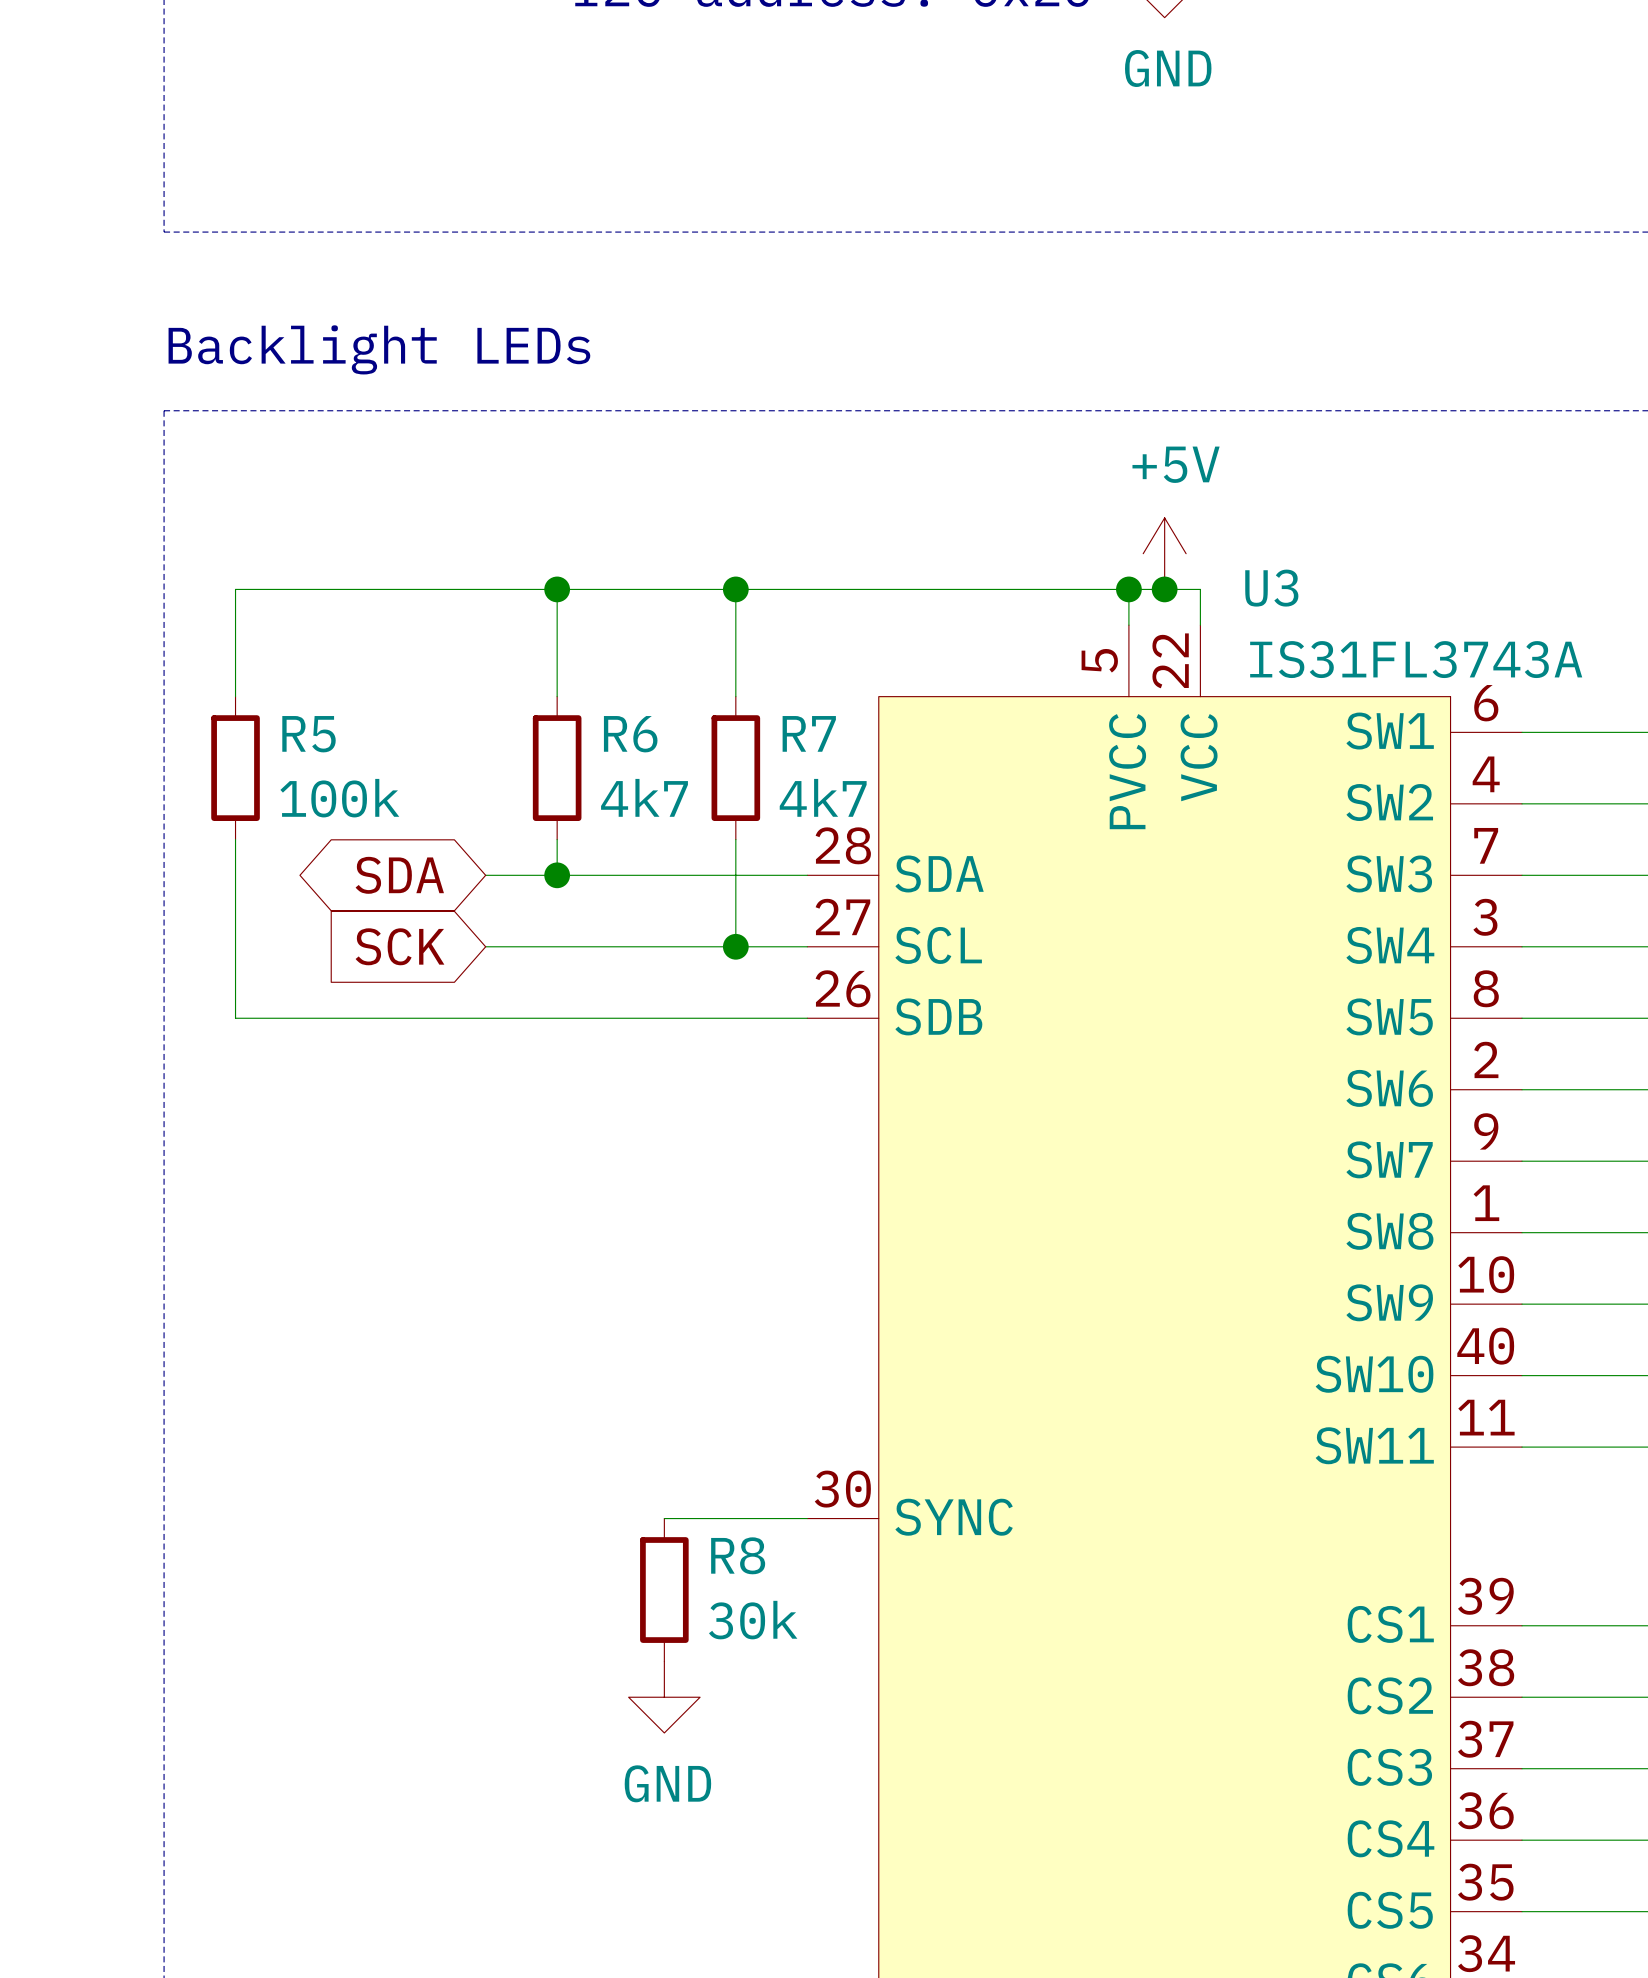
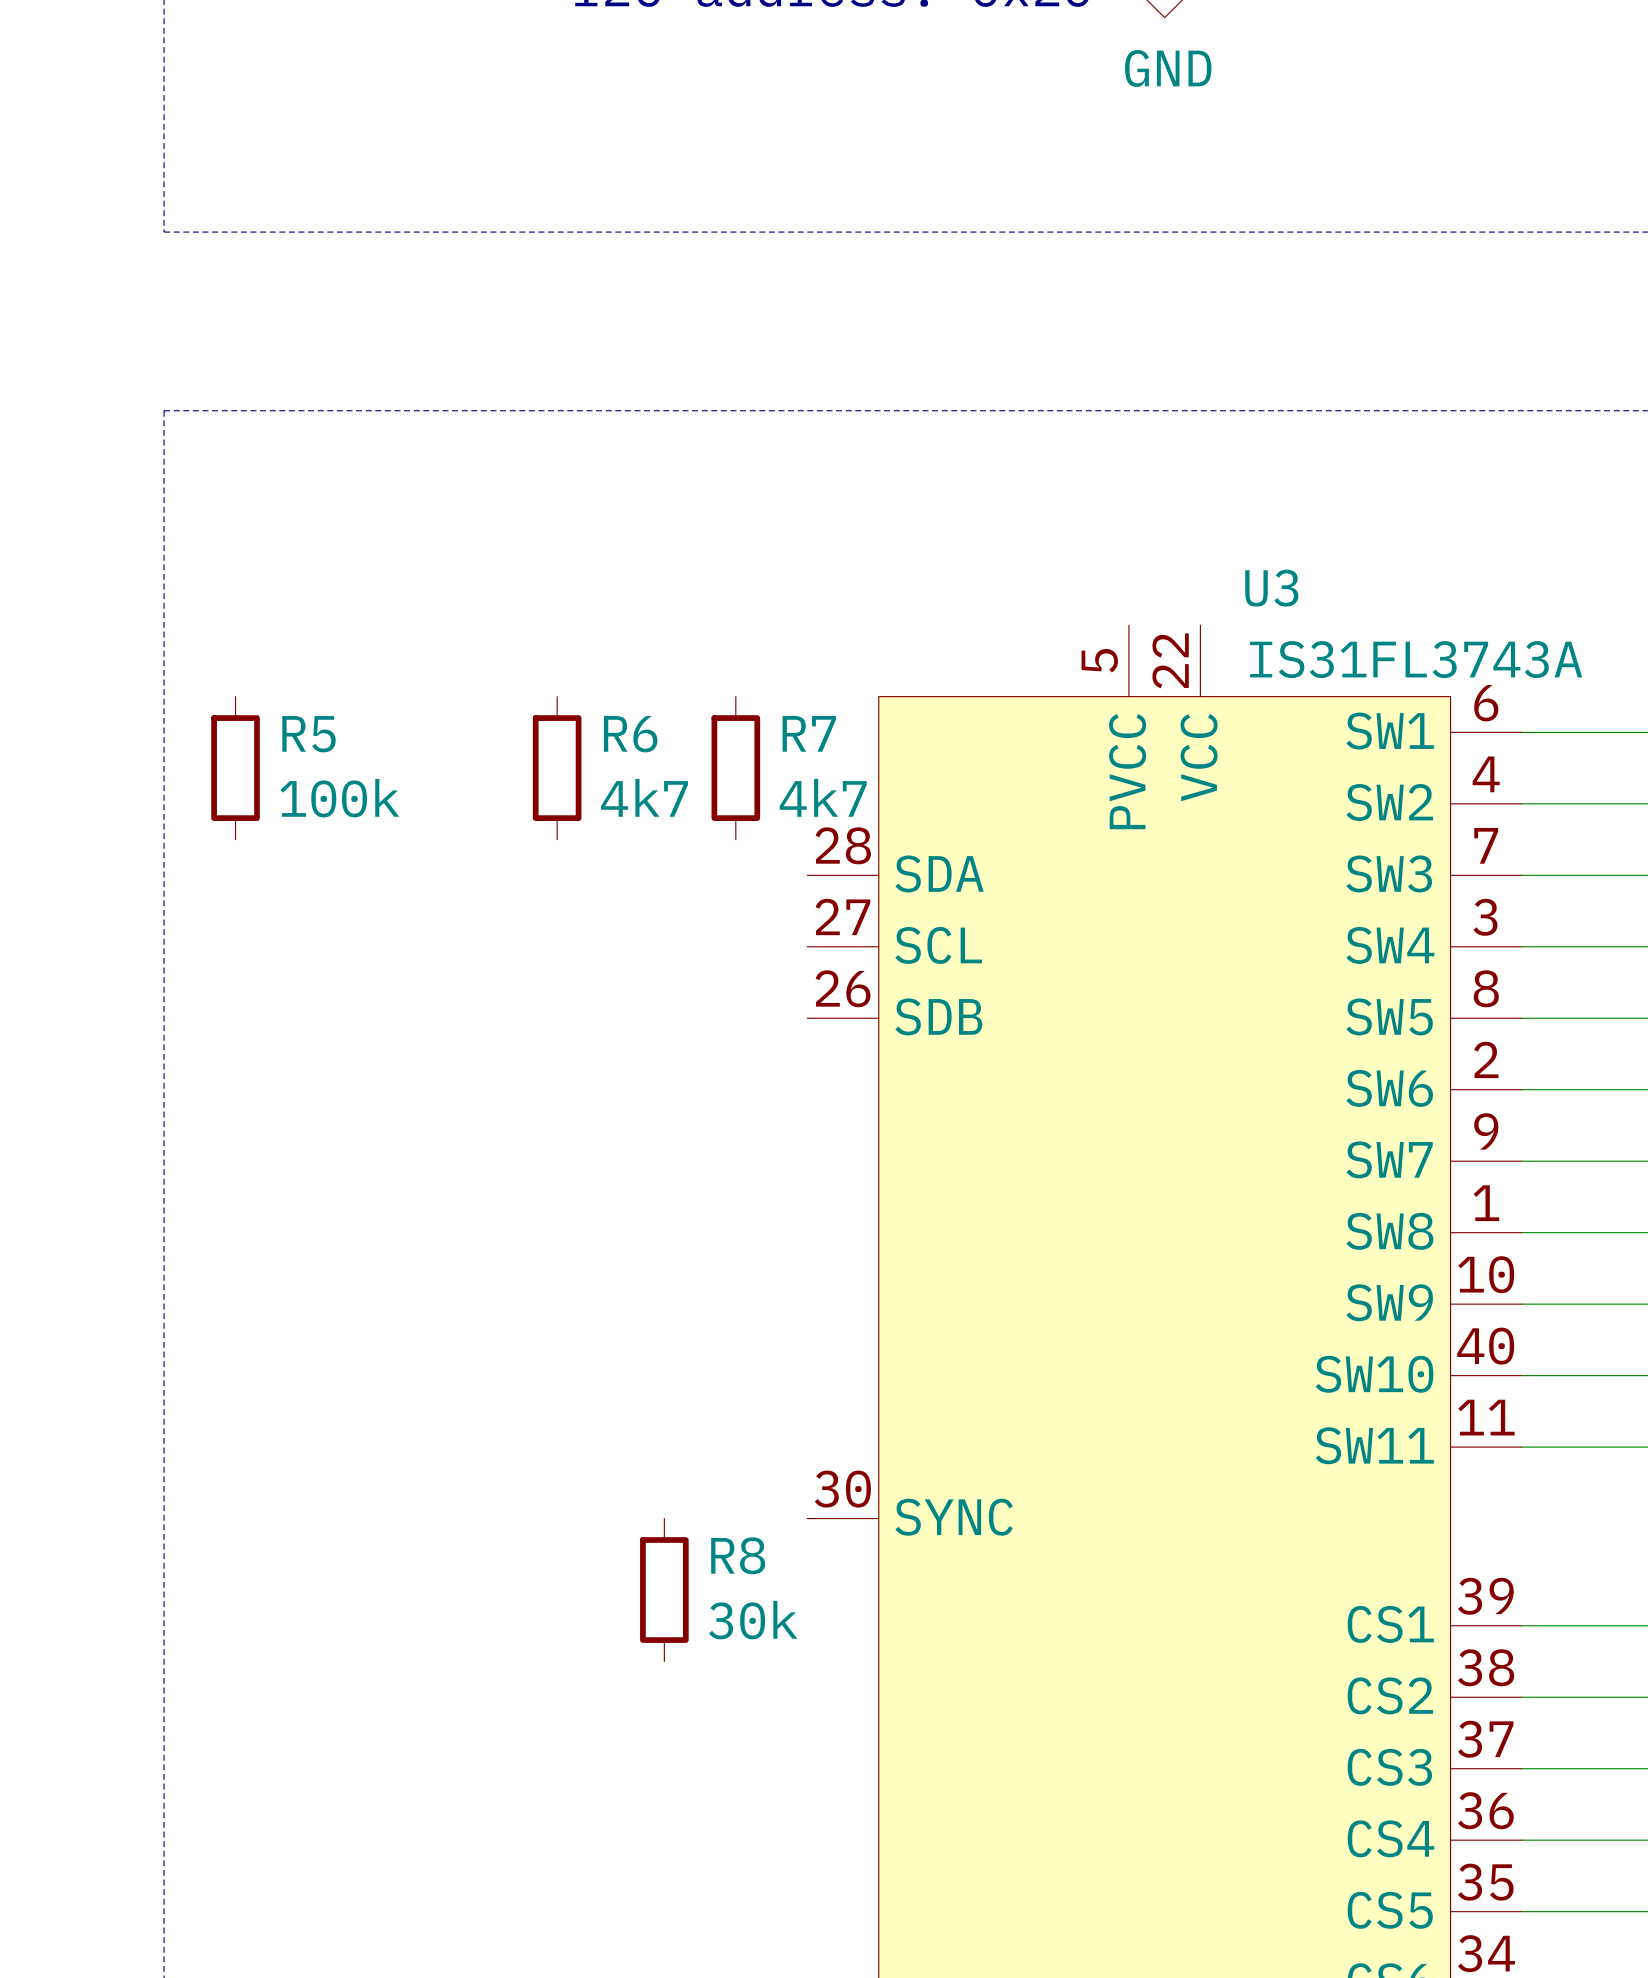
text: Backlight LEDs (379, 349) -> none
power symbol: +5V (1164, 553) -> none
wire: (557, 589) (557, 696) -> none
junction: (557, 589) -> none
wire: (735, 589) (735, 696) -> none
junction: (735, 589) -> none
wire: (1128, 589) (1128, 625) -> none
junction: (1128, 589) -> none
junction: (1164, 589) -> none
wire: (1200, 625) (1200, 589) (235, 589) (235, 696) -> none
wire: (235, 839) (235, 1018) (807, 1018) -> none
wire: (557, 839) (557, 875) -> none
wire: (735, 839) (735, 946) -> none
global label: SDA (399, 875) -> none
wire: (485, 875) (807, 875) -> none
junction: (557, 875) -> none
global label: SCK (399, 946) -> none
wire: (485, 946) (807, 946) -> none
junction: (735, 946) -> none
wire: (664, 1518) (807, 1518) -> none
power symbol: GND (664, 1697) -> none

